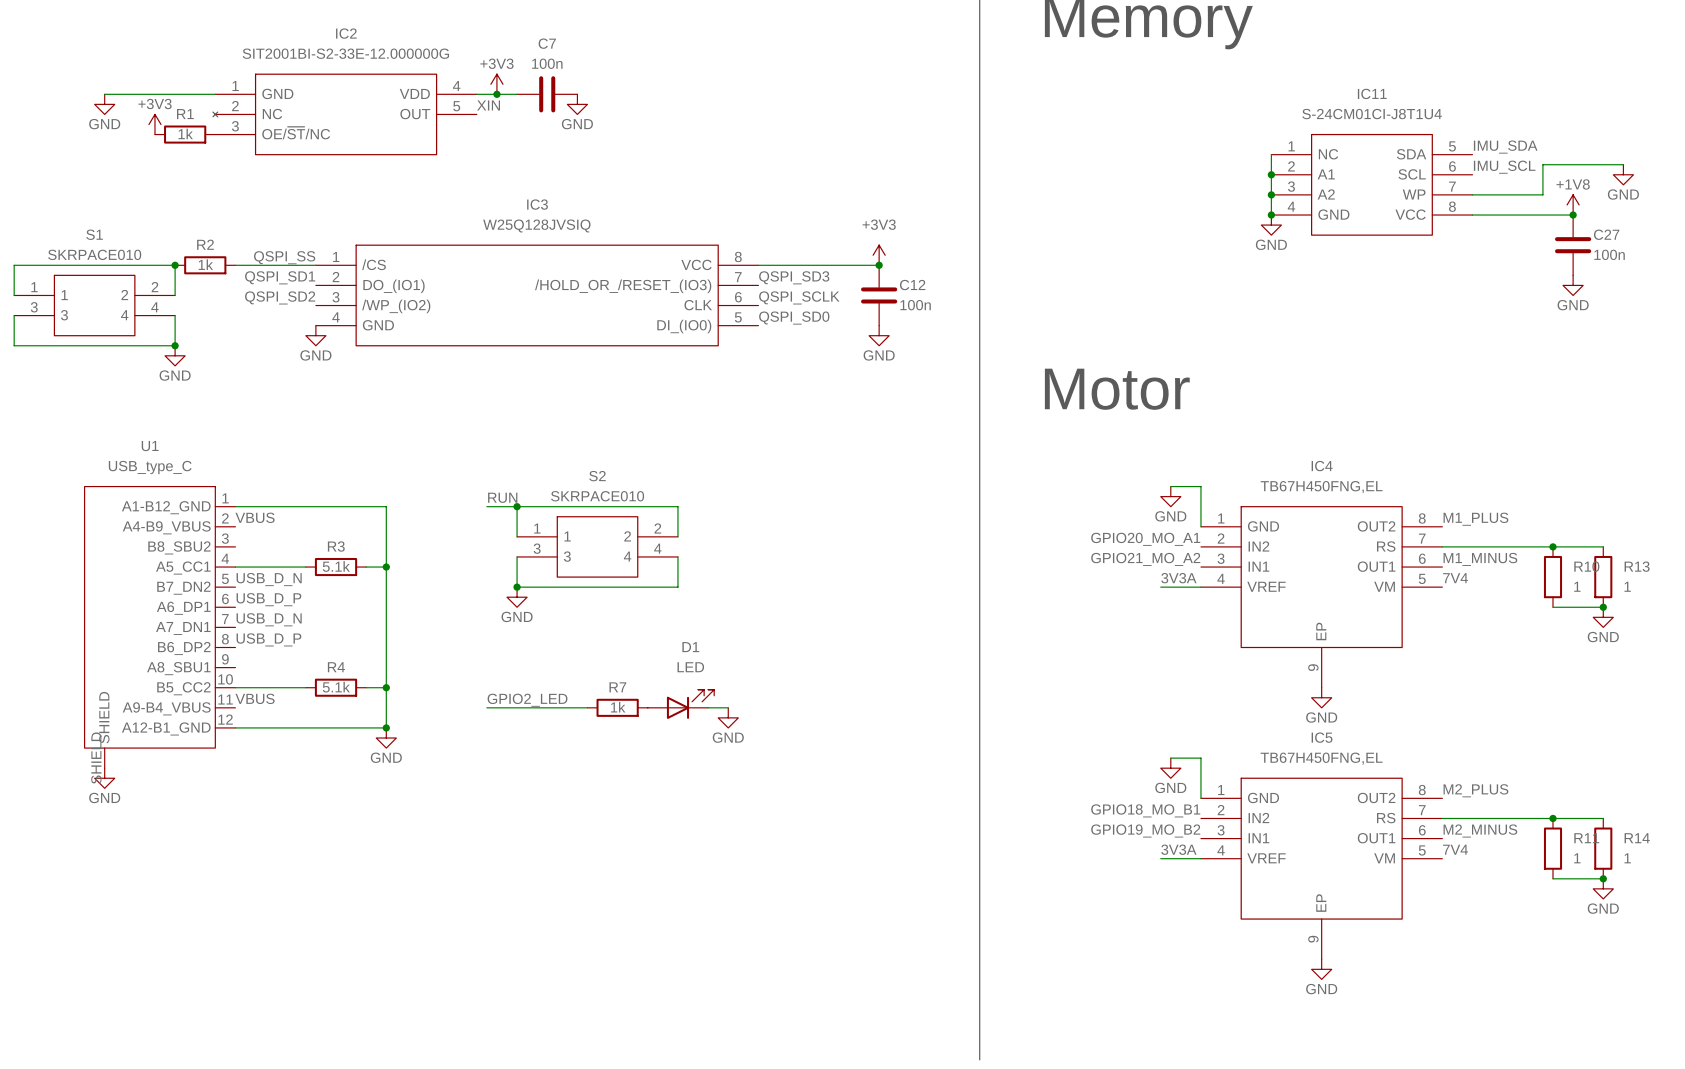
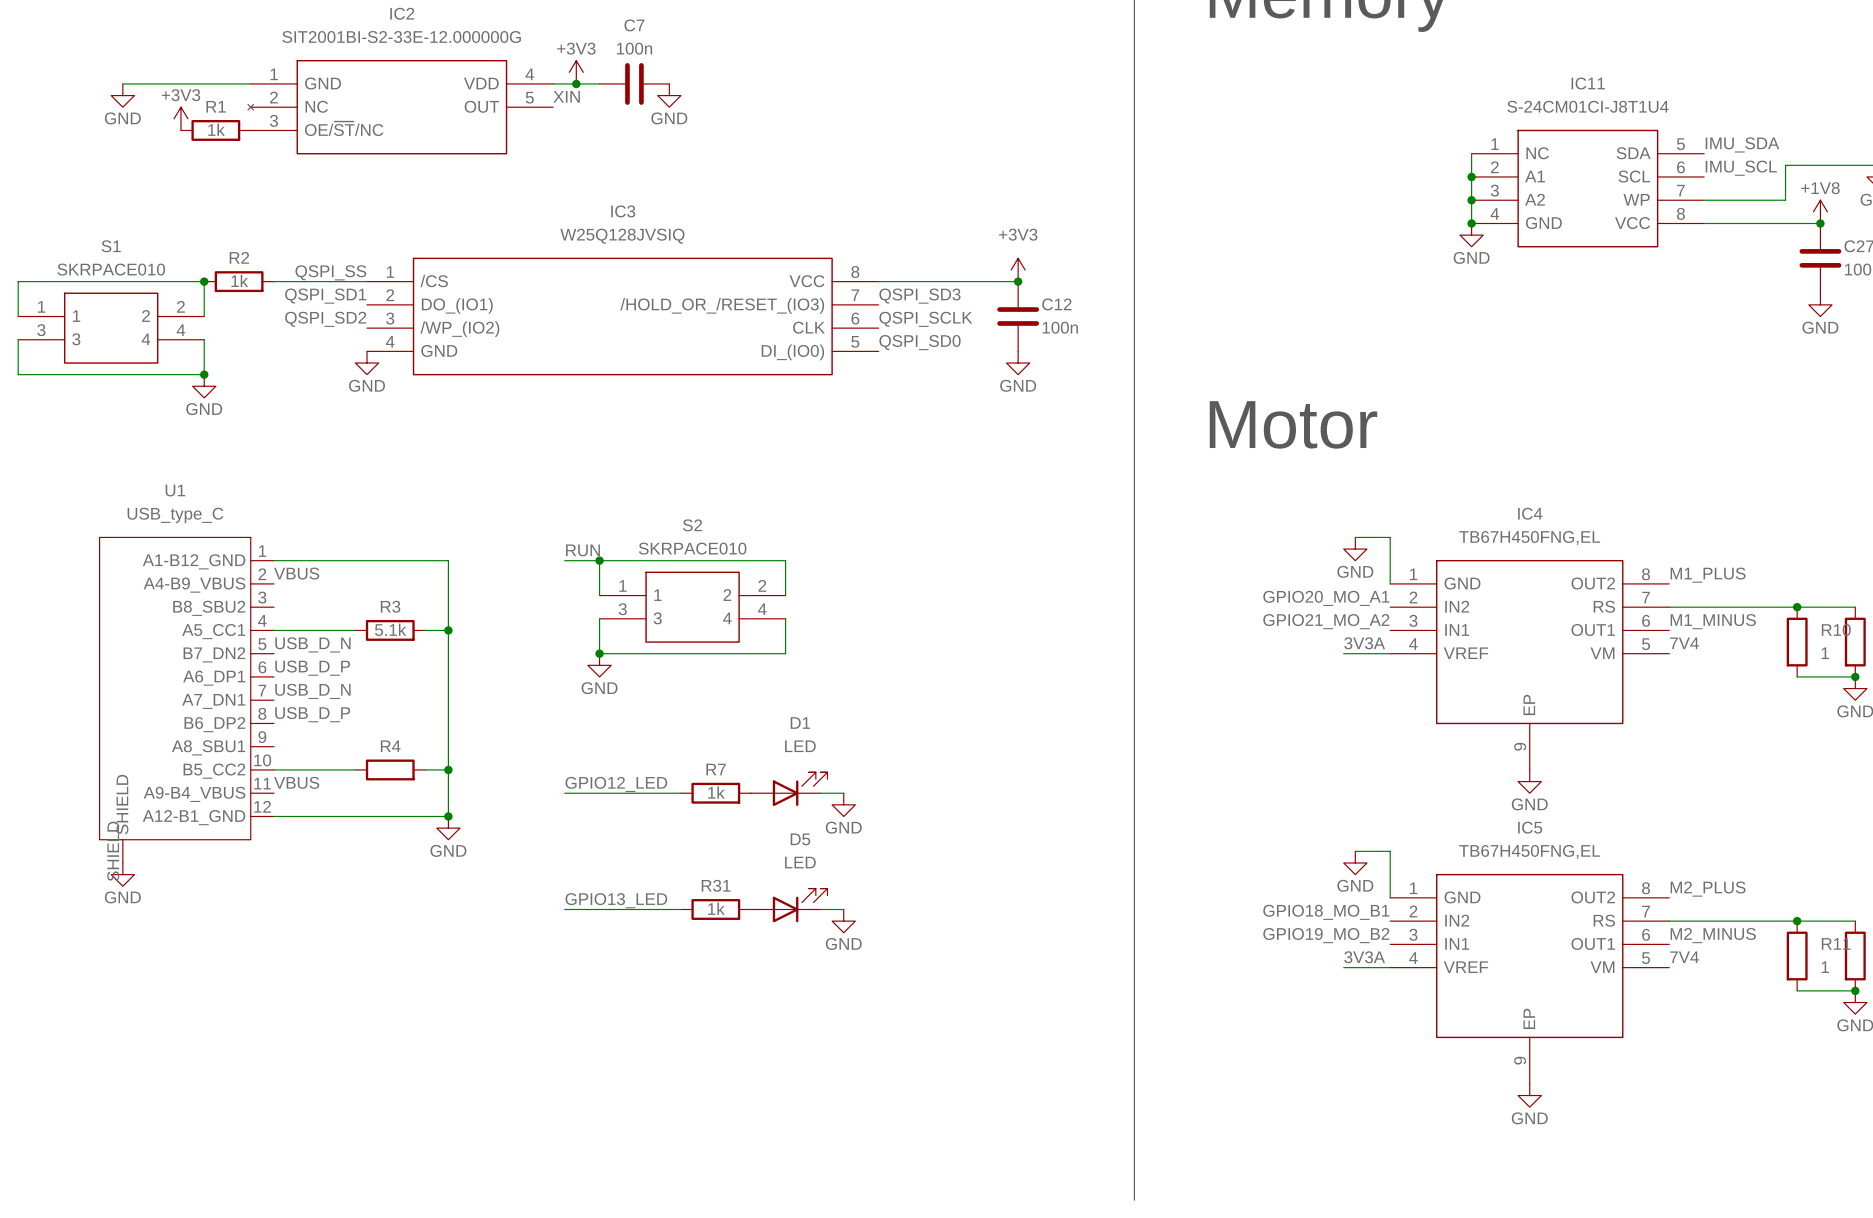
R4 value: 5.1k (336, 687) -> none
label: GPIO2_LED (527, 700) -> GPIO12_LED (616, 784)
label: none -> GPIO13_LED (616, 900)
D5: none -> LED (789, 905)
wire: none -> (564, 909) (680, 909)
R31: none -> 1k (715, 909)
wire: none -> (820, 909) (843, 909)
power symbol: none -> GND (843, 921)

